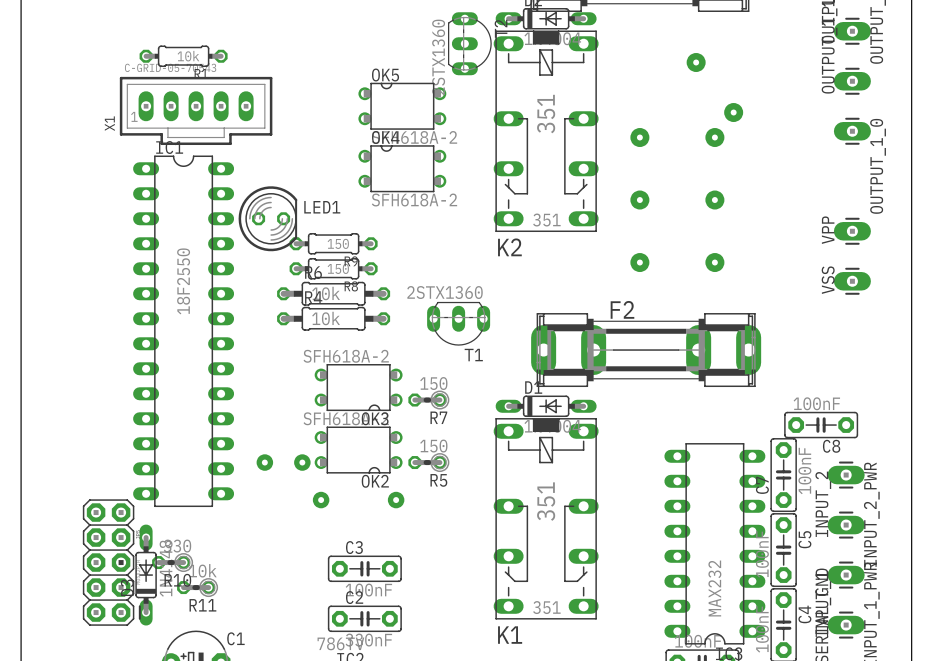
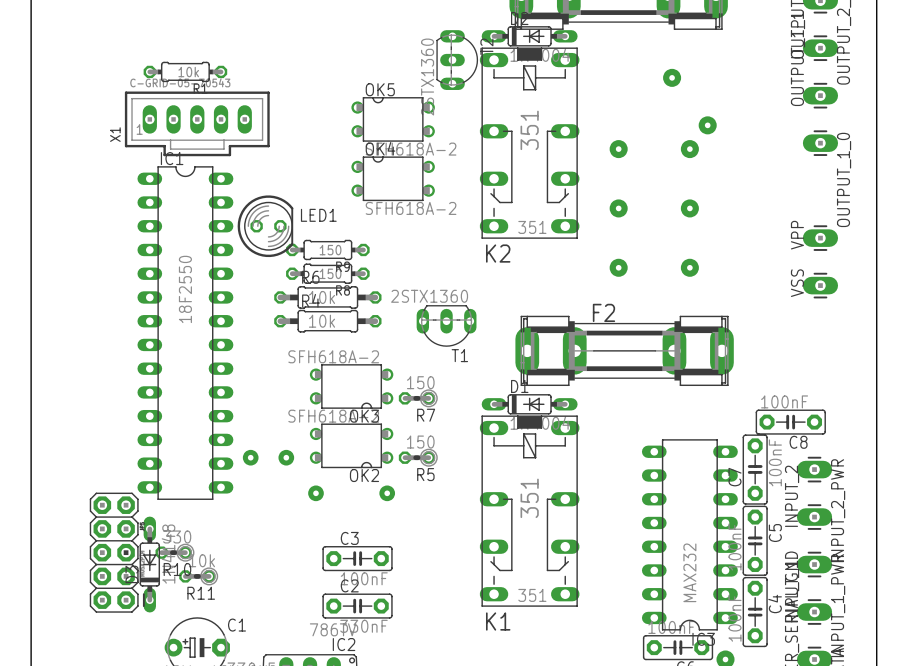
via: none -> (250, 457)
via: (264, 462) -> none
via: none -> (286, 457)
via: (302, 462) -> none

